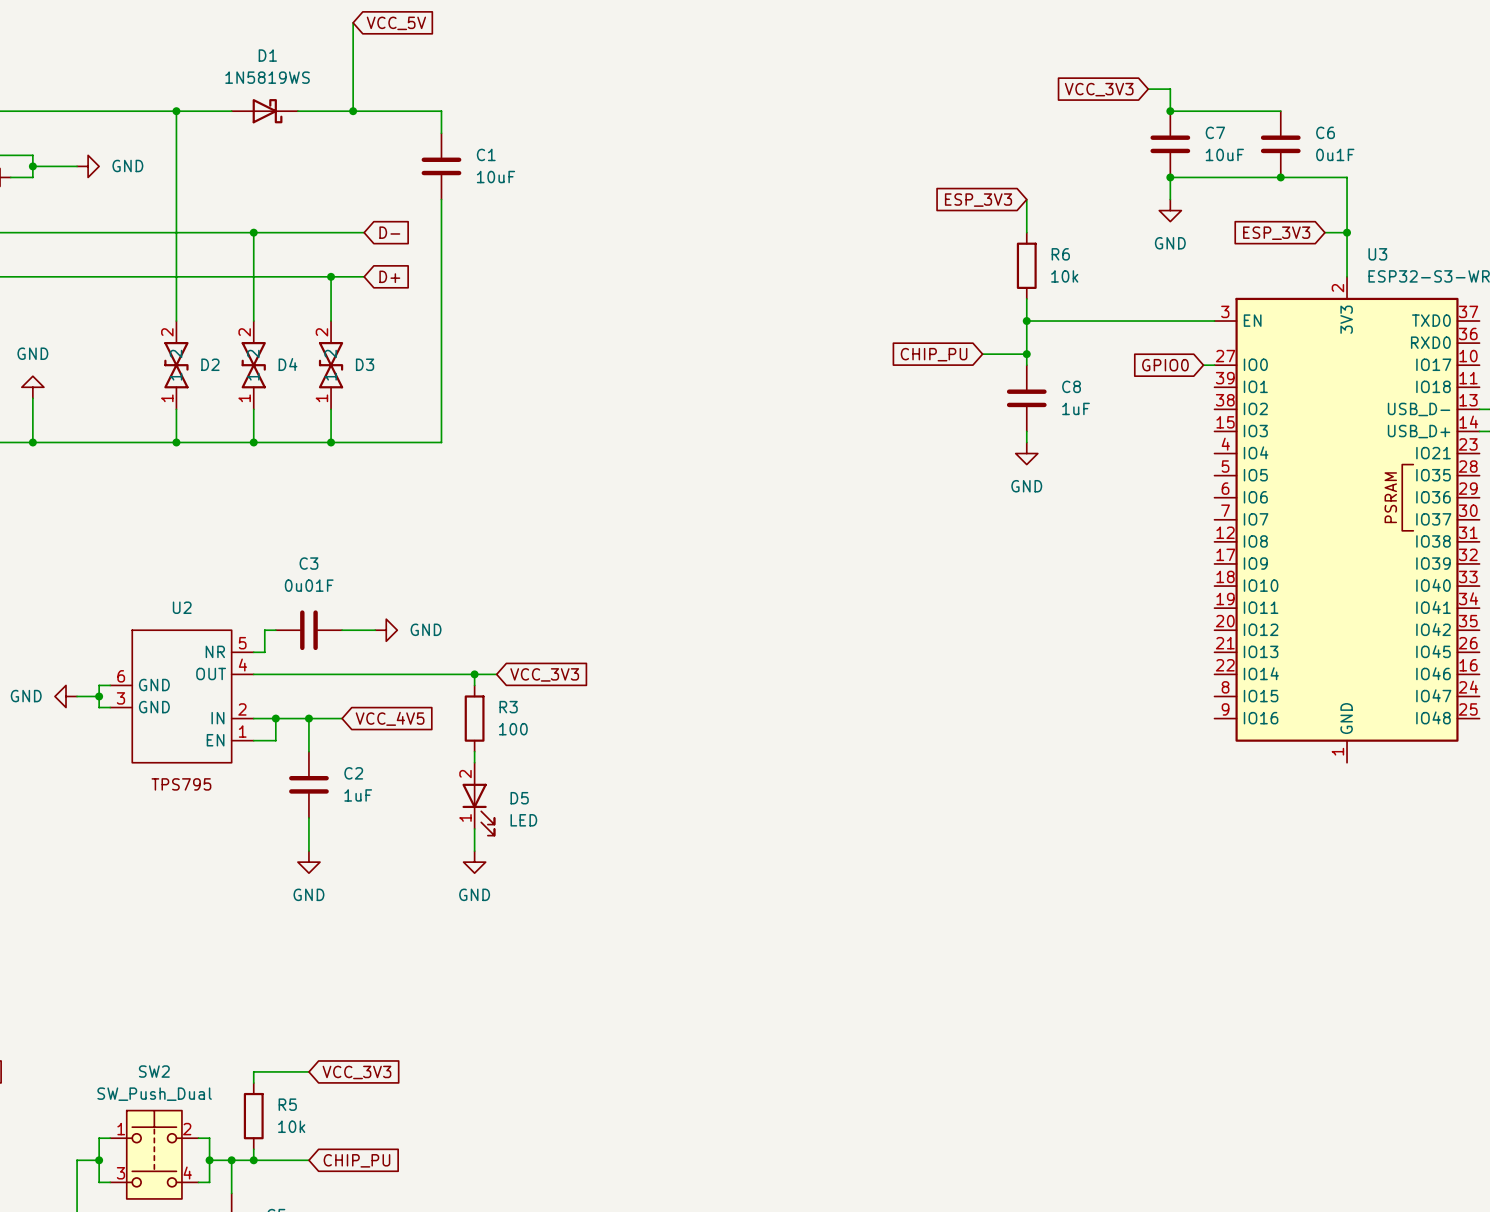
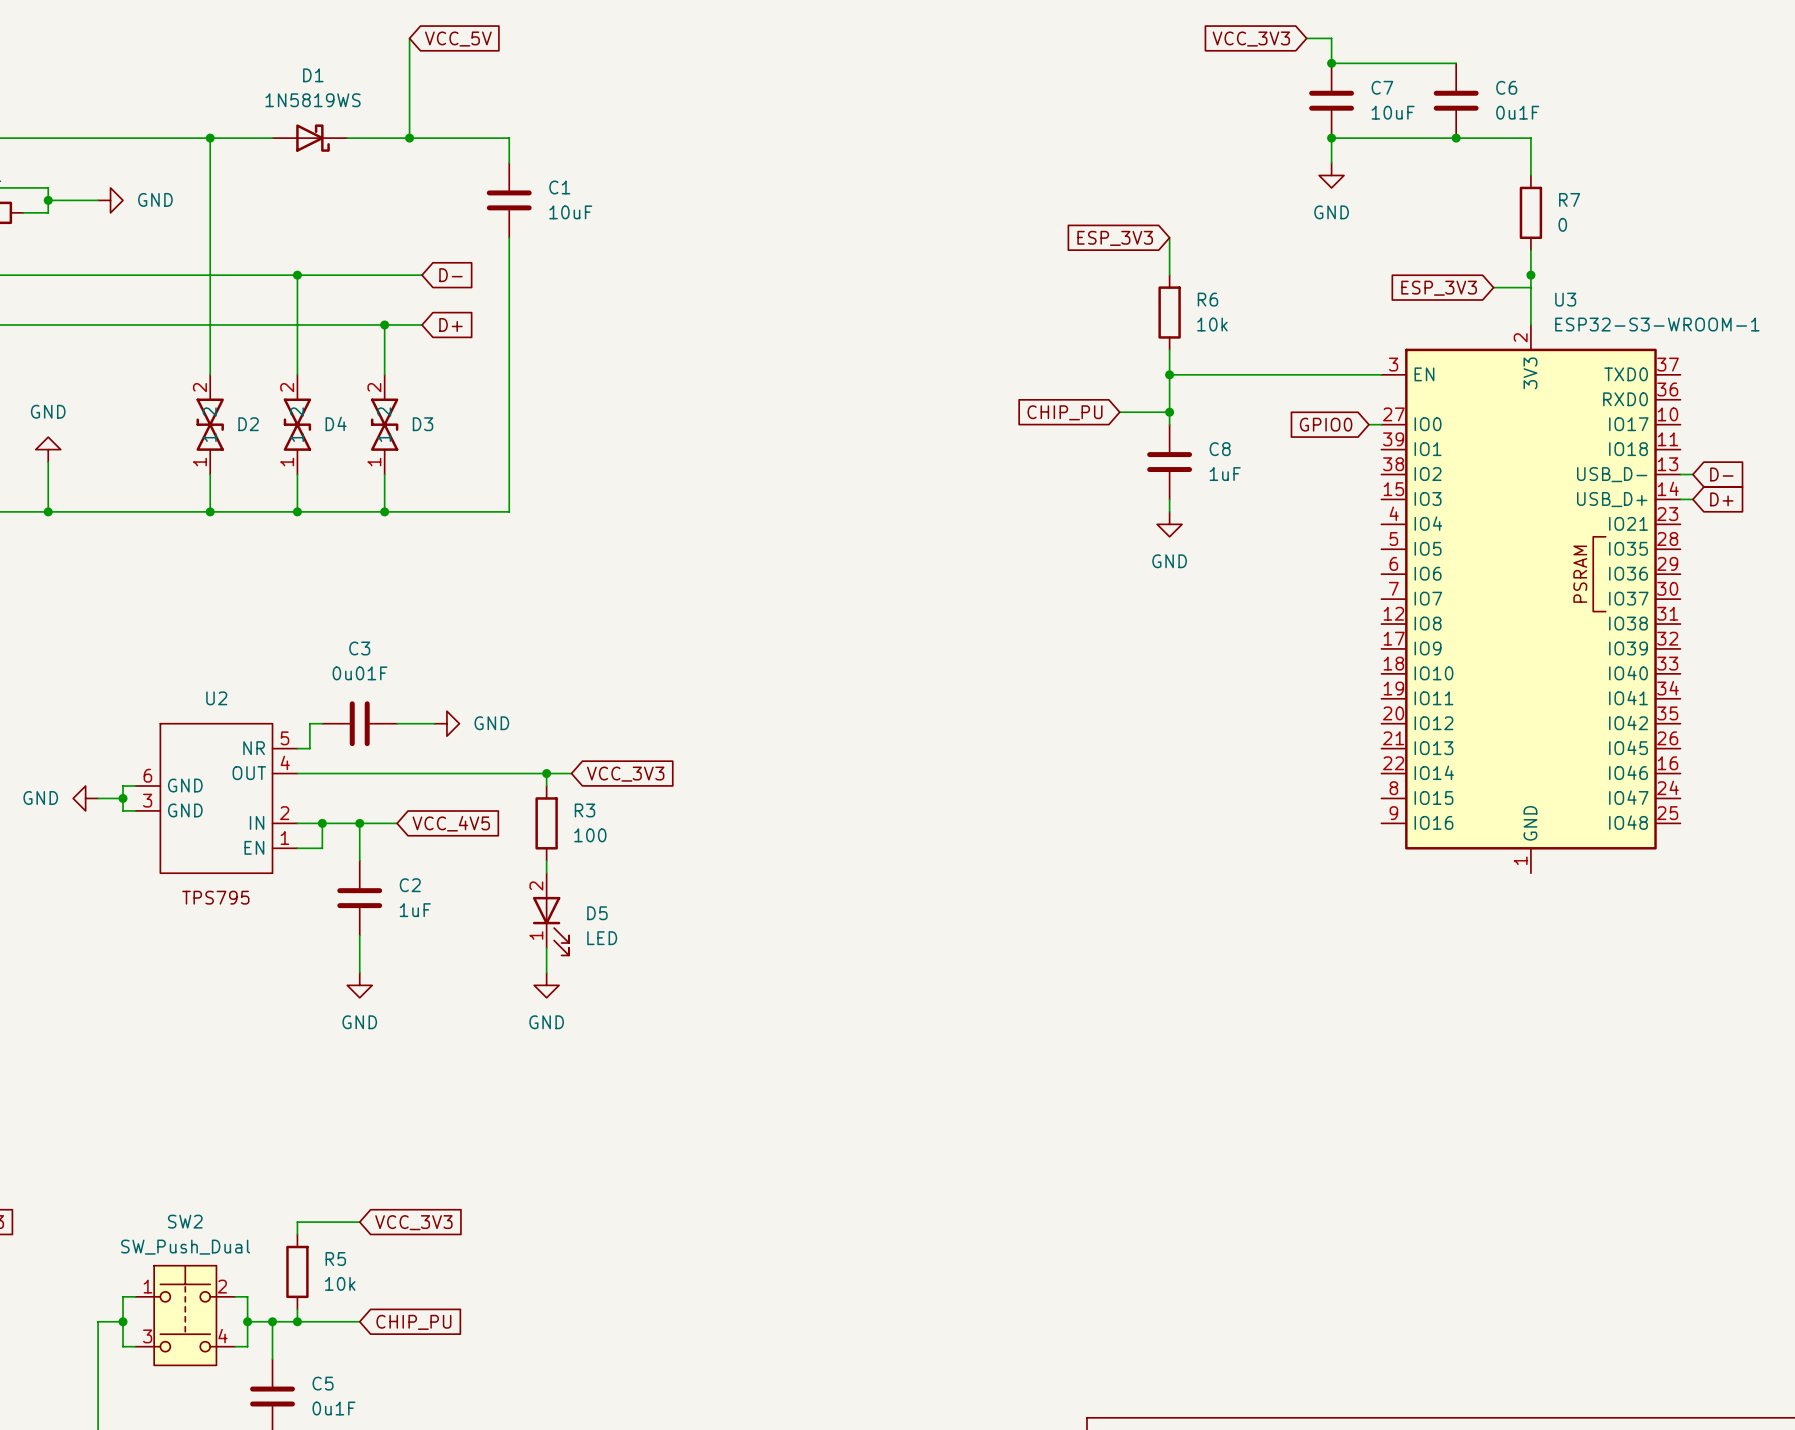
wire: none -> (1306, 38) (1331, 38) (1331, 63) (1456, 63)
junction: none -> (1331, 63)
global label position: VCC_3V3 (1099, 89) -> VCC_3V3 (1251, 39)
wire: none -> (1456, 138) (1530, 138) (1530, 175)
junction: none -> (1456, 138)
C7 position: (1170, 144) -> (1331, 100)
C6 position: (1280, 144) -> (1456, 100)
junction: (1170, 177) -> none
junction: (1280, 177) -> none
R7: none -> 0 (1530, 212)
wire: (1170, 199) (1170, 177) (1347, 177) (1347, 210) -> none
power symbol position: GND (1170, 210) -> GND (1331, 175)
wire: (1324, 232) (1347, 232) -> none
global label position: ESP_3V3 (1276, 233) -> ESP_3V3 (1439, 288)
wire: none -> (1493, 287) (1530, 287)

